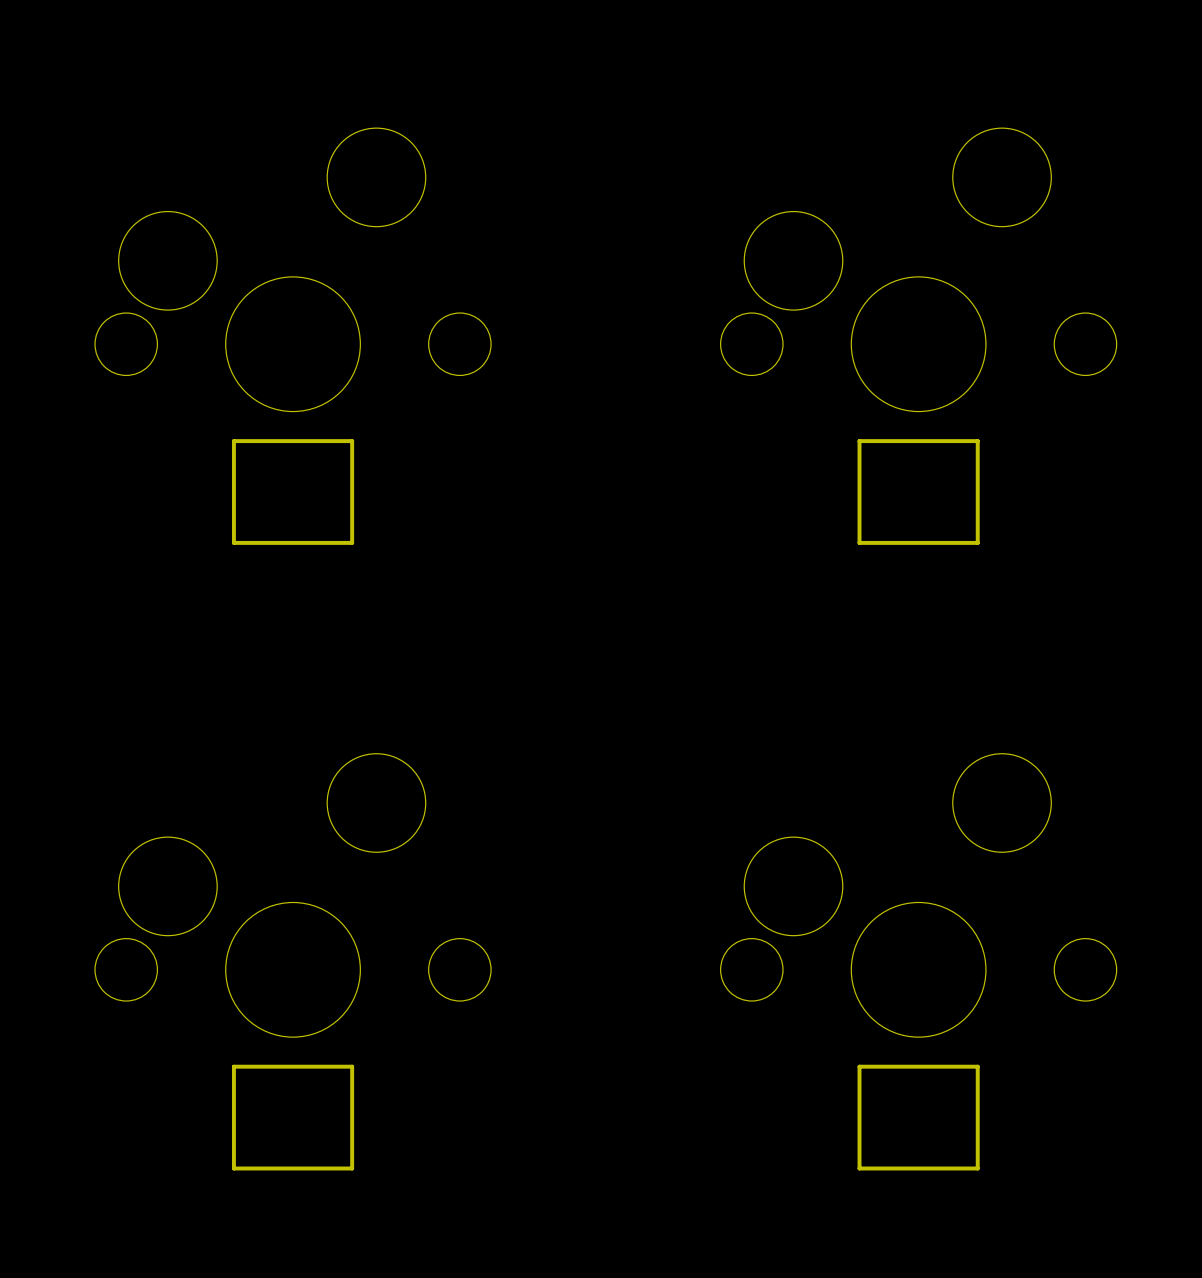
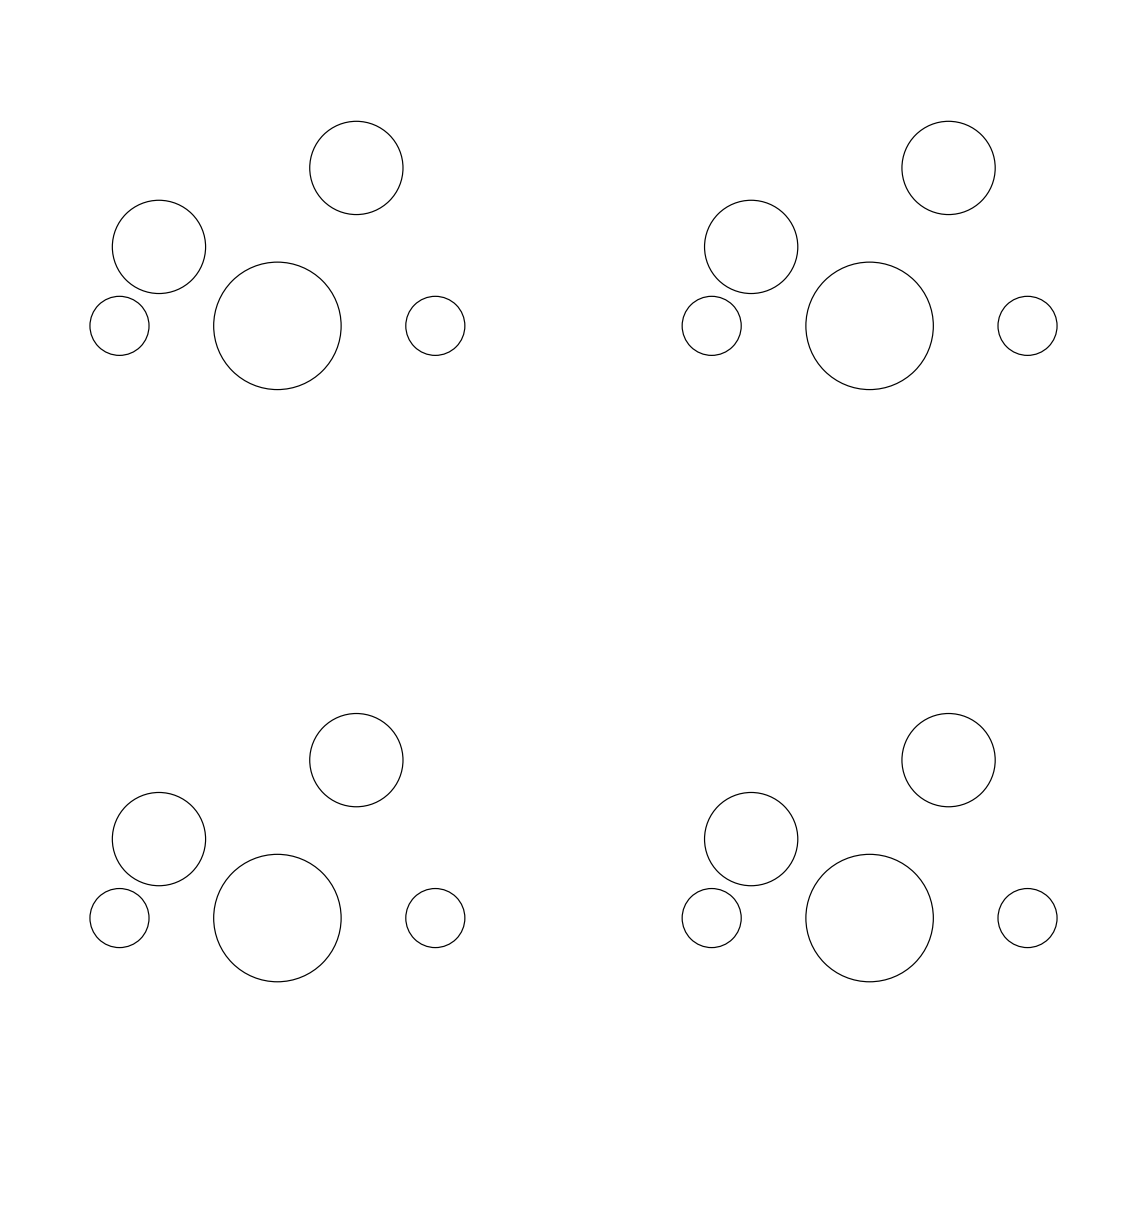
part: (293, 492) -> none
part: (918, 492) -> none
part: (293, 1117) -> none
part: (918, 1117) -> none

